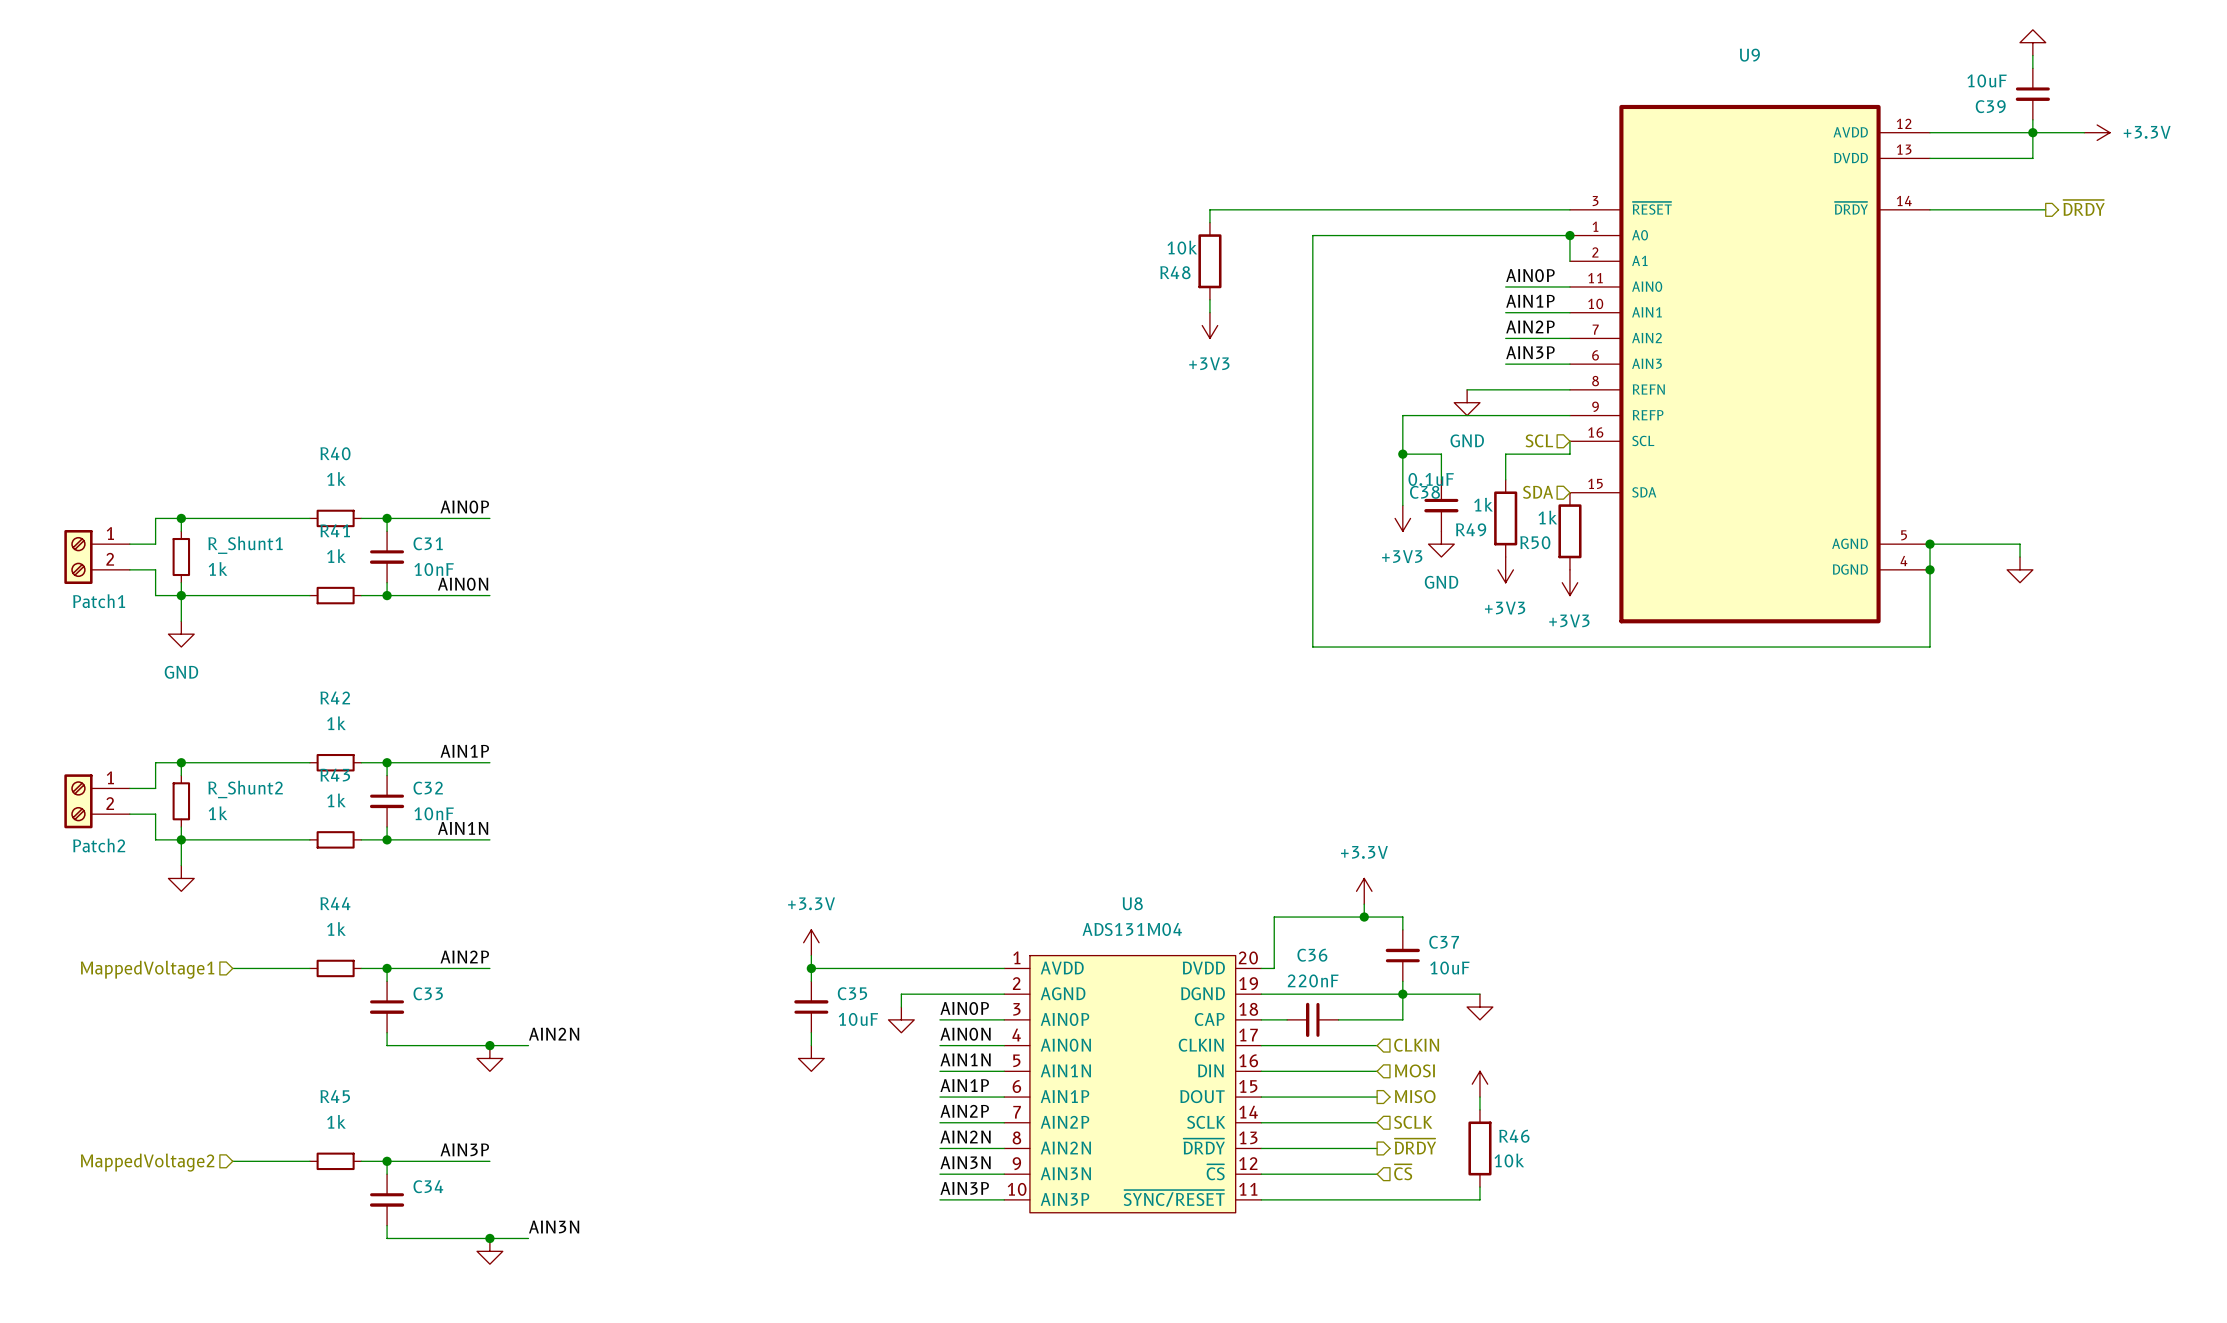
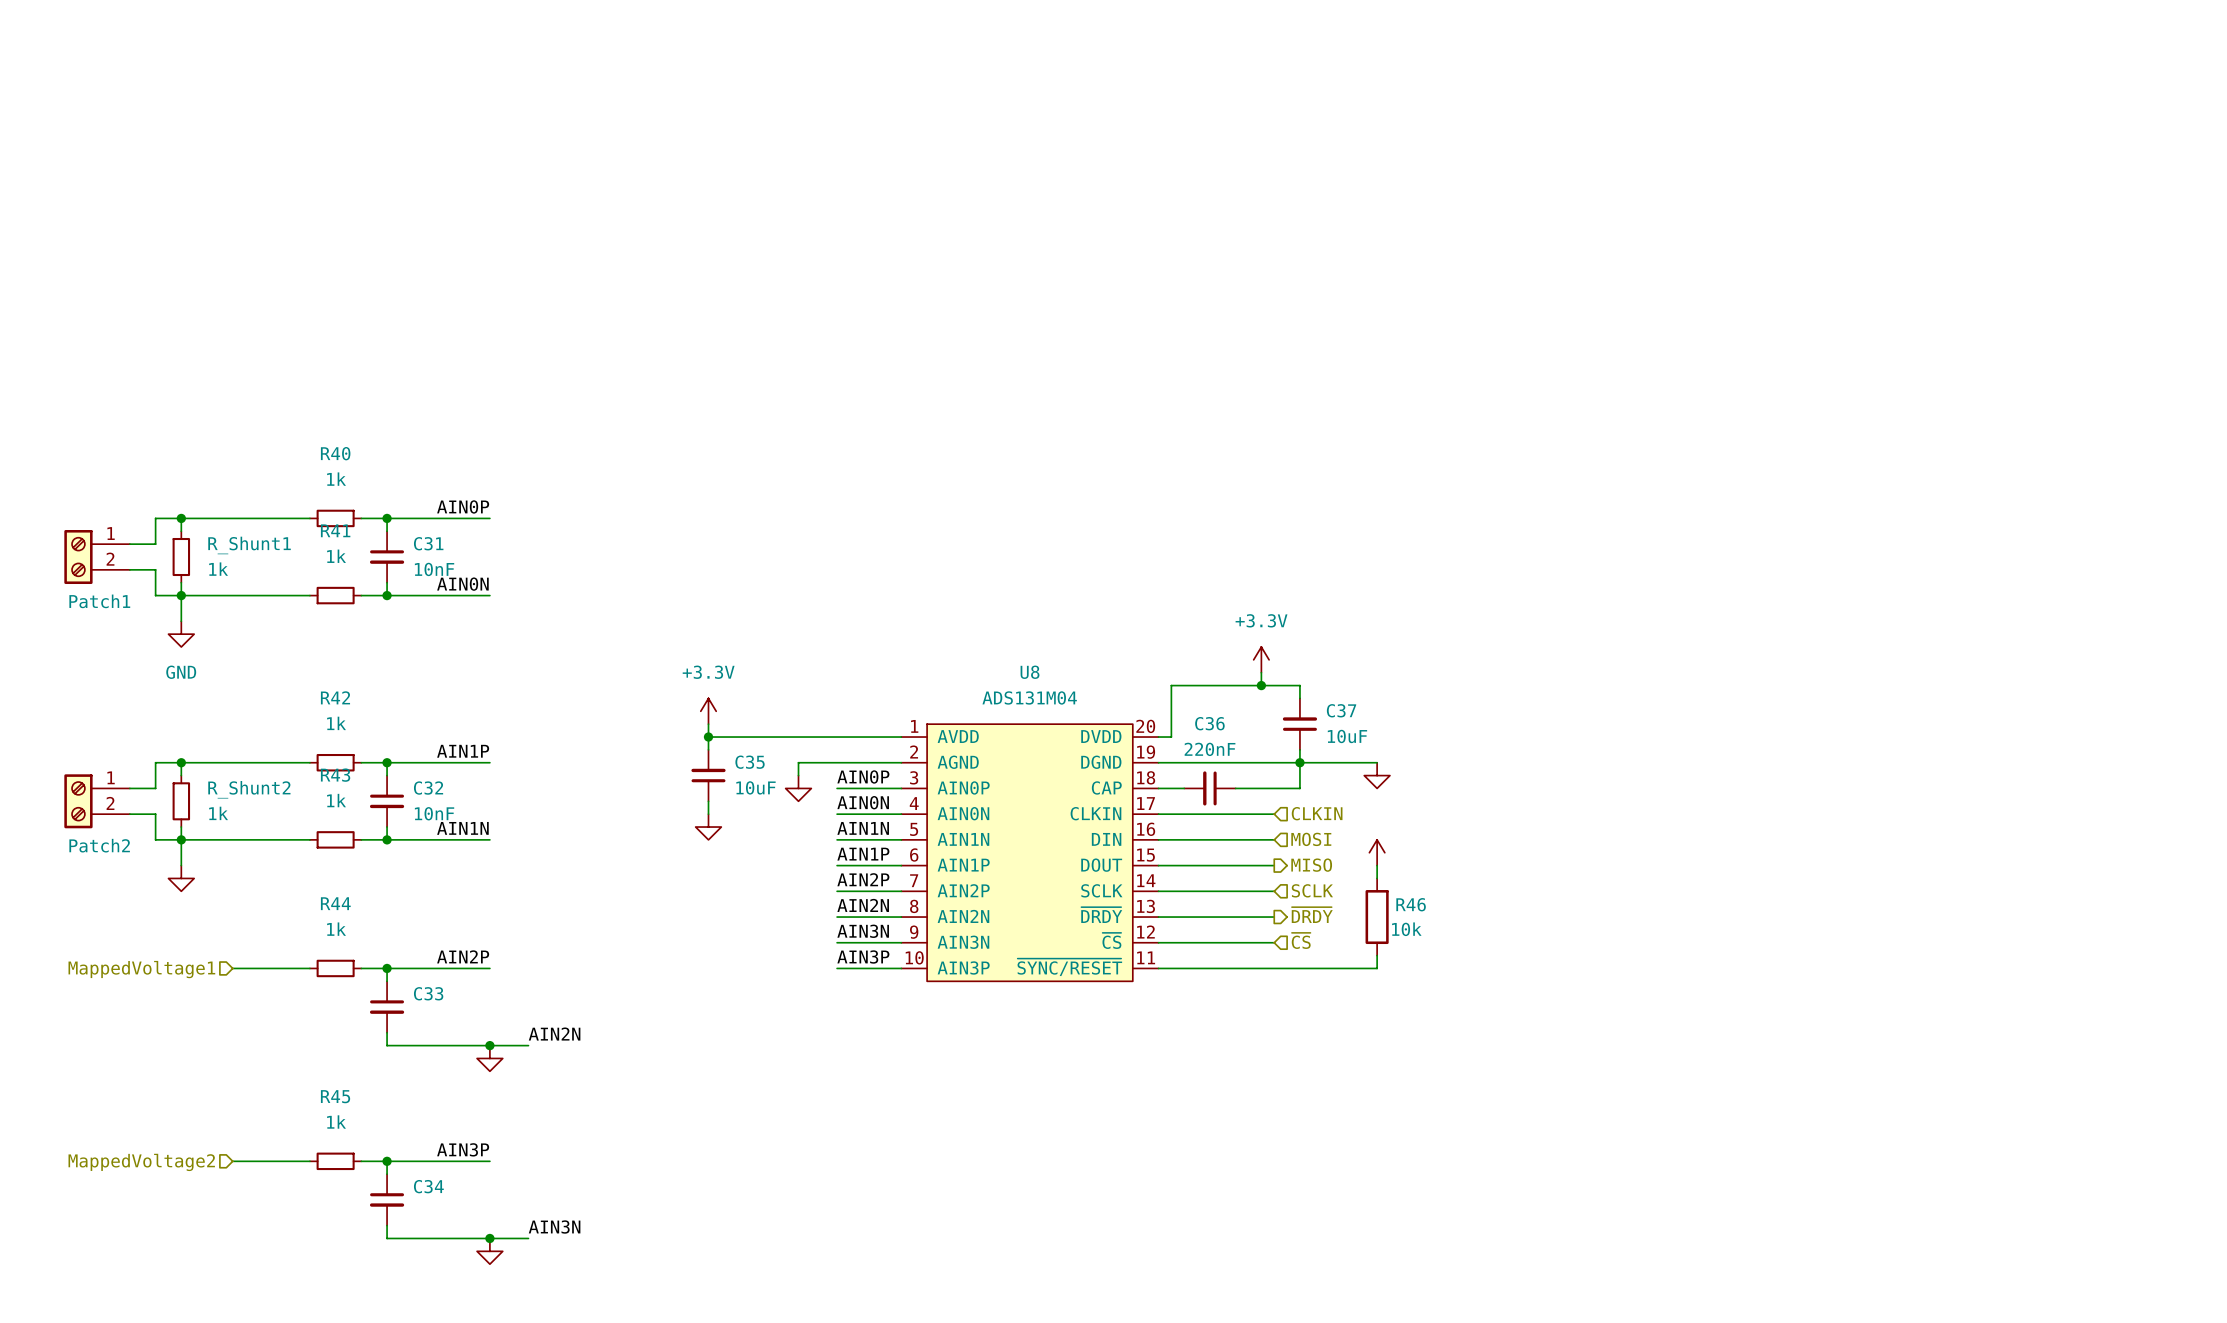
power symbol: (2032, 42) -> none
wire: (2032, 55) (2032, 68) -> none
C39: 10uF (2032, 94) -> none
wire: (2032, 119) (2032, 158) (1930, 158) -> none
wire: (1930, 132) (2084, 132) -> none
junction: (2032, 132) -> none
power symbol: +3.3V (2097, 132) -> none
hierarchical label: ~{DRDY} (2084, 207) -> none
wire: (1569, 209) (1209, 209) (1209, 222) -> none
wire: (1930, 209) (2045, 209) -> none
junction: (1569, 235) -> none
R48: 10k (1209, 261) -> none
wire: (1569, 261) (1569, 235) (1312, 235) (1312, 647) (1930, 647) (1930, 544) (2020, 544) (2020, 557) -> none
label: AIN0P (1530, 275) -> none
wire: (1505, 286) (1569, 286) -> none
wire: (1209, 299) (1209, 312) -> none
label: AIN1P (1530, 301) -> none
wire: (1505, 312) (1569, 312) -> none
power symbol: +3V3 (1209, 325) -> none
label: AIN2P (1530, 326) -> none
wire: (1505, 338) (1569, 338) -> none
label: AIN3P (1530, 352) -> none
wire: (1505, 364) (1569, 364) -> none
U9: (1749, 364) -> none
wire: (1467, 389) (1569, 389) -> none
power symbol: GND (1467, 402) -> none
wire: (1569, 415) (1402, 415) (1402, 505) -> none
hierarchical label: SCL (1539, 440) -> none
wire: (1569, 441) (1569, 454) (1505, 454) (1505, 479) -> none
wire: (1402, 454) (1441, 454) (1441, 479) -> none
junction: (1402, 454) -> none
hierarchical label: SDA (1538, 492) -> none
C38: 0.1uF (1441, 505) -> none
power symbol: +3V3 (1402, 518) -> none
R49: 1k (1505, 518) -> none
R50: 1k (1569, 531) -> none
power symbol: GND (1441, 544) -> none
junction: (1930, 544) -> none
power symbol: +3V3 (1505, 569) -> none
junction: (1930, 569) -> none
power symbol: (2020, 569) -> none
power symbol: +3V3 (1569, 582) -> none
power symbol: none -> +3.3V (1261, 659)
wire: none -> (1261, 672) (1261, 685)
junction: none -> (1261, 685)
wire: none -> (1299, 698) (1299, 685) (1171, 685) (1171, 737) (1158, 737)
power symbol: none -> +3.3V (708, 711)
wire: none -> (708, 724) (708, 749)
wire: none -> (708, 737) (901, 737)
junction: none -> (708, 737)
wire: none -> (1299, 749) (1299, 788) (1235, 788)
wire: none -> (901, 762) (798, 762) (798, 775)
wire: none -> (1158, 762) (1377, 762)
junction: none -> (1299, 762)
power symbol: none -> (1377, 775)
label: none -> AIN0P (863, 776)
power symbol: none -> (798, 788)
wire: none -> (837, 788) (901, 788)
wire: none -> (1158, 788) (1184, 788)
wire: none -> (708, 801) (708, 814)
label: none -> AIN0N (863, 802)
hierarchical label: none -> CLKIN (1317, 813)
wire: none -> (1158, 814) (1274, 814)
power symbol: none -> (708, 827)
label: none -> AIN1N (863, 828)
hierarchical label: none -> MOSI (1311, 839)
power symbol: none -> (1377, 852)
label: none -> AIN1P (863, 854)
hierarchical label: none -> MISO (1311, 865)
label: none -> AIN2P (863, 879)
hierarchical label: none -> SCLK (1312, 890)
power symbol: +3.3V (1364, 891) -> none
wire: (1364, 904) (1364, 917) -> (1377, 865) (1377, 878)
label: none -> AIN2N (863, 905)
hierarchical label: none -> ~{DRDY} (1312, 915)
junction: (1364, 917) -> none
wire: (1402, 929) (1402, 917) (1274, 917) (1274, 968) -> (1377, 955) (1377, 968) (1274, 968)
label: none -> AIN3N (863, 931)
hierarchical label: none -> ~{CS} (1301, 940)
power symbol: +3.3V (811, 942) -> none
wire: (811, 955) (811, 981) -> none
C37 position: (1402, 955) -> (1299, 724)
label: none -> AIN3P (863, 956)
wire: (811, 968) (837, 968) -> none
junction: (811, 968) -> none
wire: (1402, 981) (1402, 1019) (1338, 1019) -> none
wire: (1004, 994) (901, 994) (901, 1007) -> none
wire: (1261, 994) (1479, 994) -> none
junction: (1402, 994) -> none
C35 position: (811, 1007) -> (708, 775)
power symbol: (1479, 1007) -> none
label: AIN0P (964, 1008) -> none
power symbol: (901, 1019) -> none
wire: (939, 1019) (1004, 1019) -> (837, 814) (901, 814)
wire: (1261, 1019) (1287, 1019) -> none
C36 position: (1312, 1019) -> (1209, 788)
wire: (811, 1032) (811, 1045) -> none
label: AIN0N (965, 1034) -> none
wire: (939, 1045) (1004, 1045) -> (837, 839) (901, 839)
wire: (1261, 1045) (1377, 1045) -> (1158, 839) (1274, 839)
hierarchical label: CLKIN (1416, 1045) -> none
power symbol: (811, 1058) -> none
label: AIN1N (965, 1059) -> none
hierarchical label: MOSI (1414, 1070) -> none
wire: (939, 1071) (1004, 1071) -> (837, 865) (901, 865)
wire: (1261, 1071) (1377, 1071) -> (1158, 865) (1274, 865)
U8 position: (1132, 1084) -> (1029, 852)
power symbol: (1479, 1084) -> none
label: AIN1P (964, 1085) -> none
hierarchical label: MISO (1415, 1096) -> none
wire: (939, 1097) (1004, 1097) -> (837, 891) (901, 891)
wire: (1261, 1097) (1377, 1097) -> (1158, 891) (1274, 891)
wire: (1479, 1097) (1479, 1109) -> none
label: AIN2P (964, 1111) -> none
wire: (939, 1122) (1004, 1122) -> (837, 917) (901, 917)
wire: (1261, 1122) (1377, 1122) -> (1158, 917) (1274, 917)
hierarchical label: SCLK (1413, 1122) -> none
label: AIN2N (965, 1136) -> none
hierarchical label: ~{DRDY} (1415, 1146) -> none
wire: (939, 1148) (1004, 1148) -> (837, 942) (901, 942)
wire: (1261, 1148) (1377, 1148) -> (1158, 942) (1274, 942)
R46 position: (1479, 1148) -> (1377, 917)
label: AIN3N (965, 1162) -> none
hierarchical label: ~{CS} (1403, 1172) -> none
wire: (939, 1174) (1004, 1174) -> none
wire: (1261, 1174) (1377, 1174) -> none
wire: (1479, 1187) (1479, 1199) (1261, 1199) -> none
label: AIN3P (964, 1188) -> none
wire: (939, 1199) (1004, 1199) -> none

